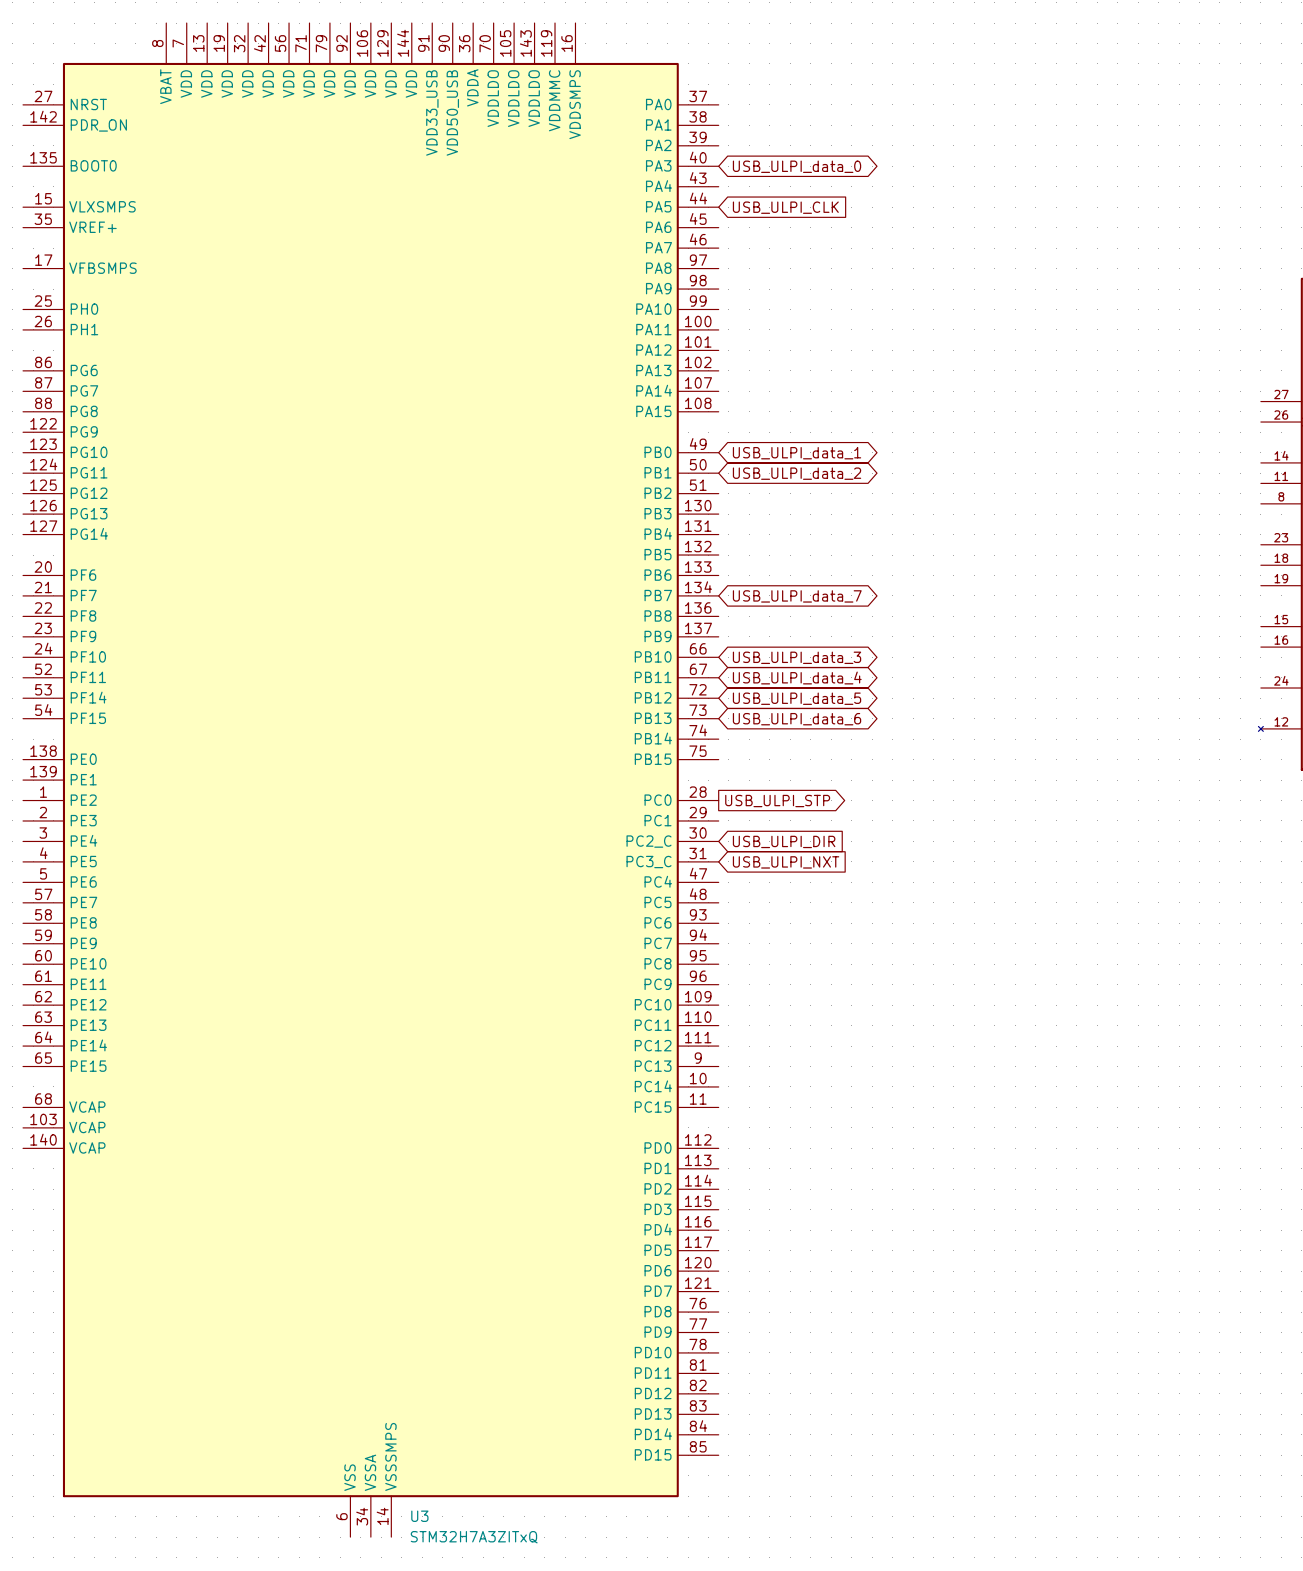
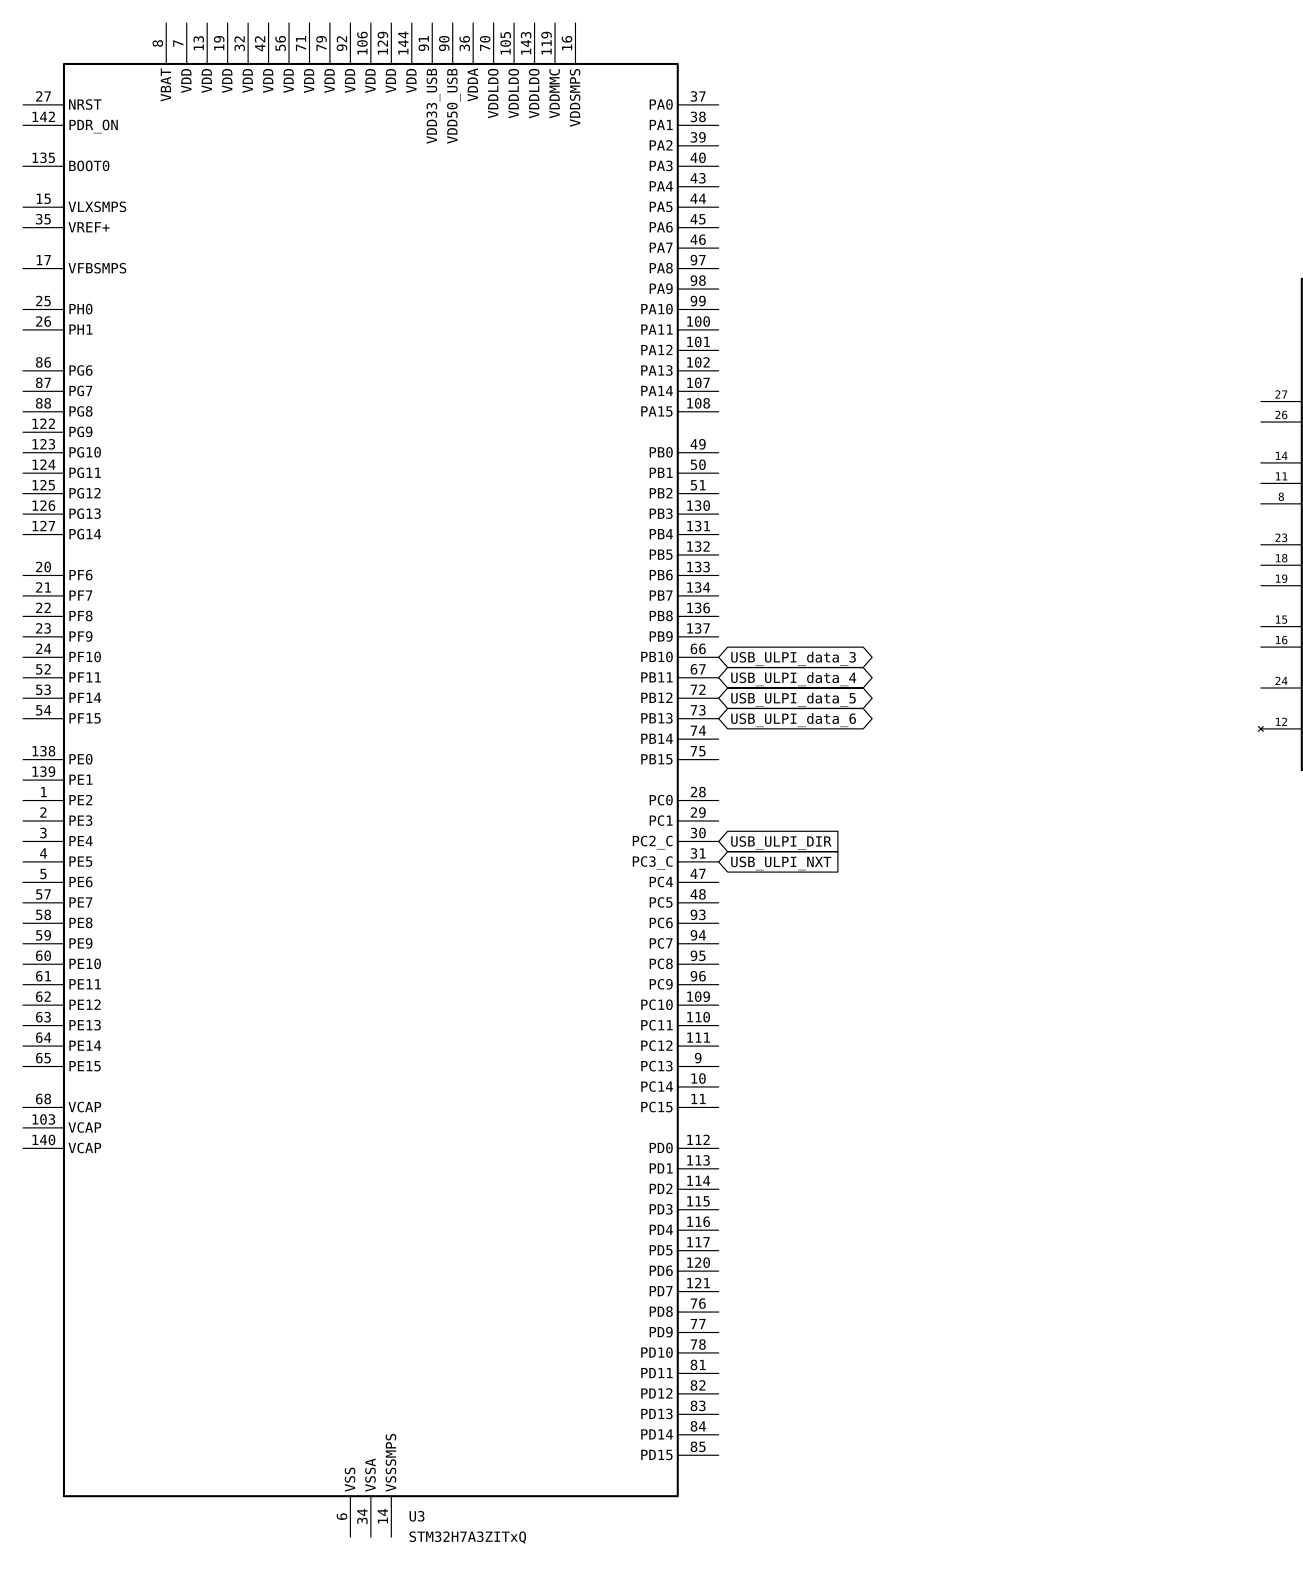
global label: USB_ULPI_data_0 (797, 166) -> none
global label: USB_ULPI_CLK (785, 207) -> none
global label: USB_ULPI_data_1 (797, 453) -> none
global label: USB_ULPI_data_2 (797, 473) -> none
global label: USB_ULPI_data_7 (797, 596) -> none
global label: USB_ULPI_STP (777, 801) -> none

